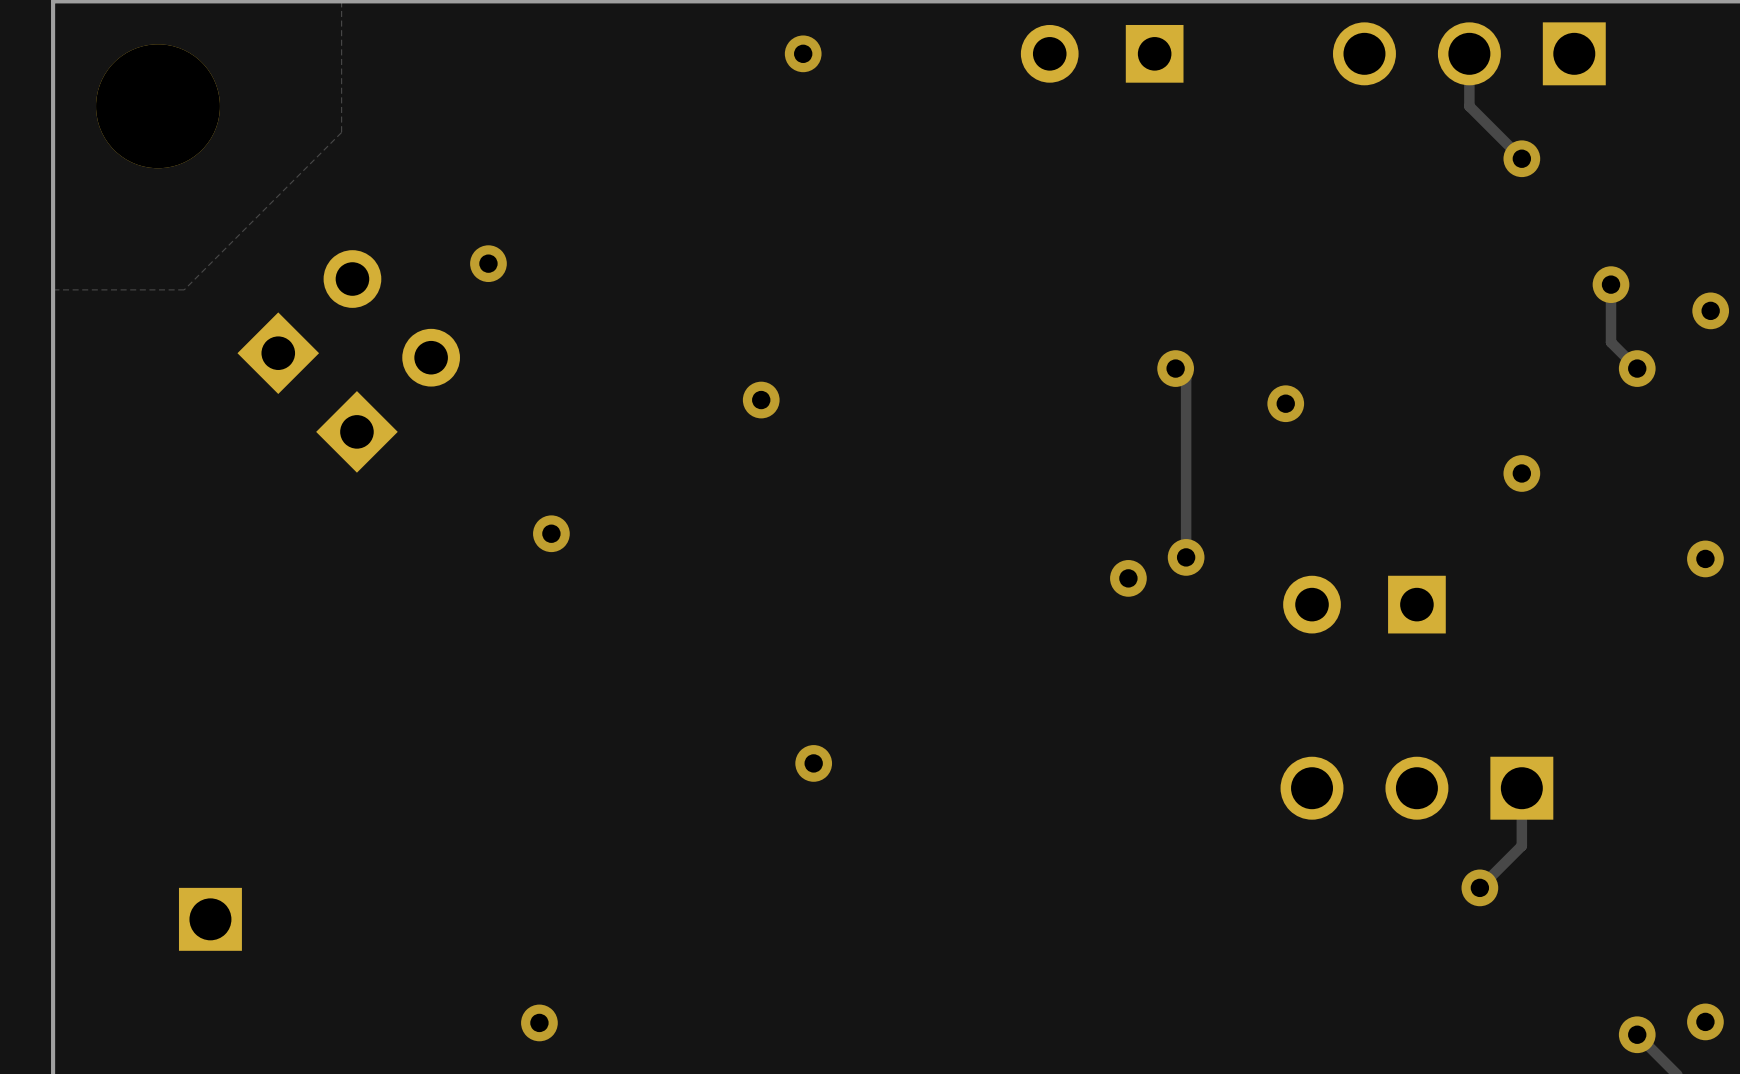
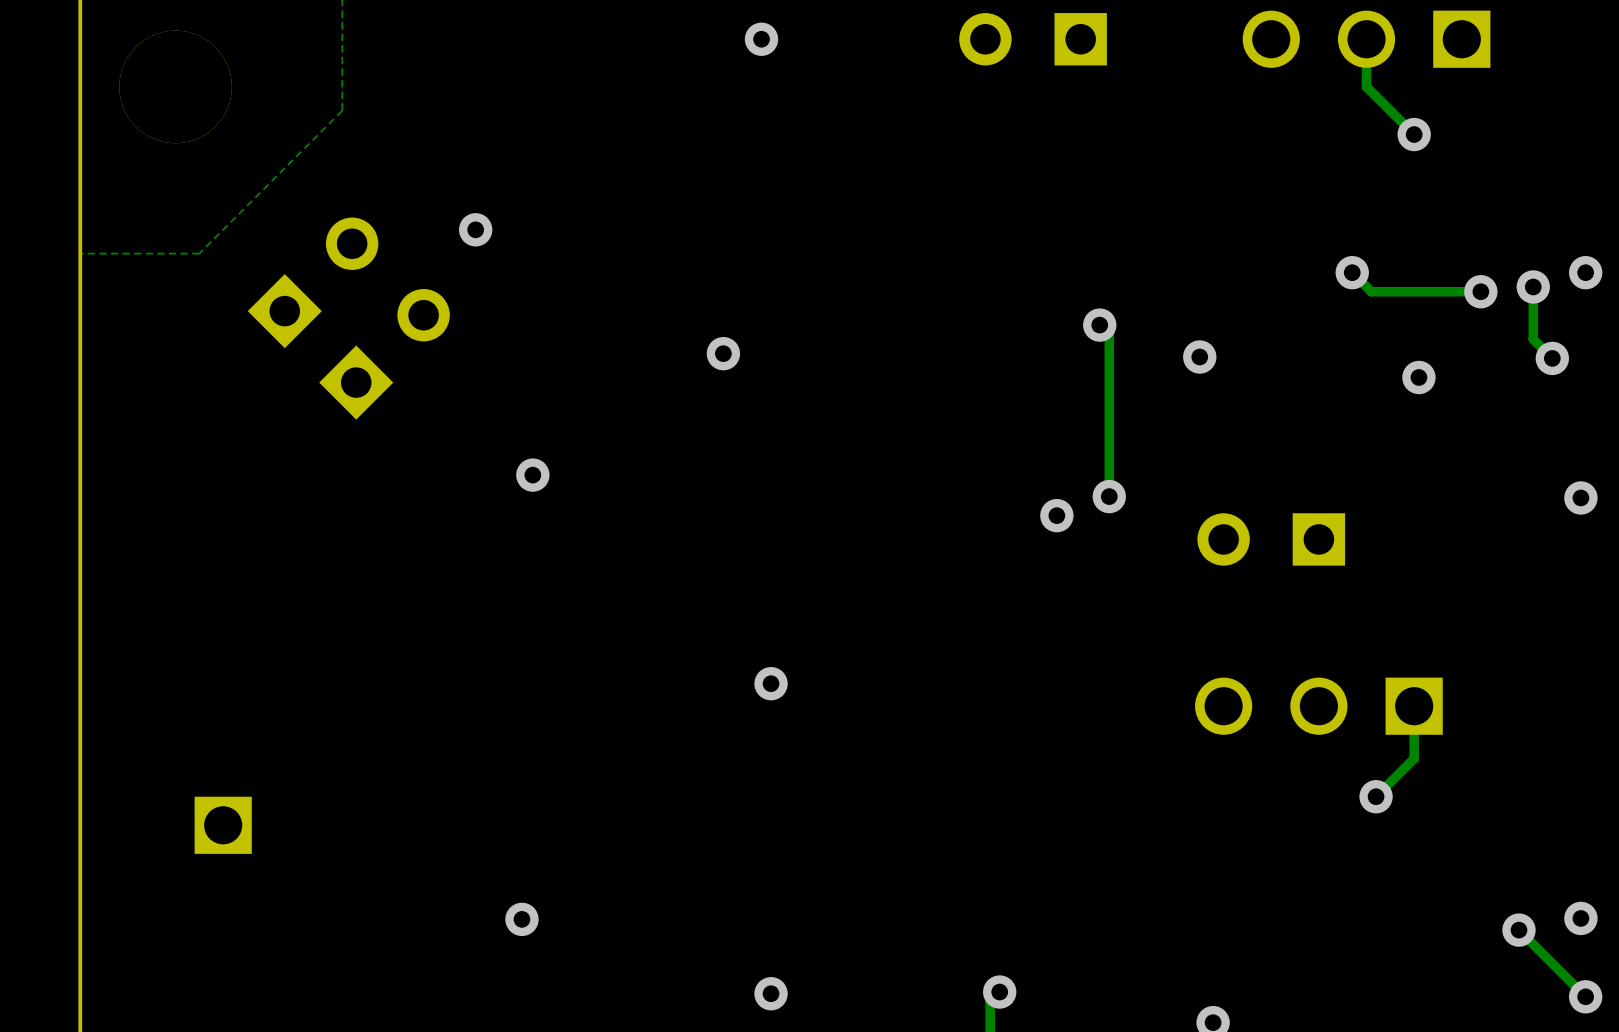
track: (1611, 284) (1611, 342) (1637, 368) -> none
via: (1611, 284) -> none
track: none -> (1352, 272) (1371, 291) (1480, 291)
via: none -> (1352, 272)
track: none -> (1533, 286) (1533, 339) (1552, 358)
via: none -> (1533, 286)
via: none -> (1480, 291)
via: (1637, 368) -> none
via: none -> (1552, 358)
via position: (1521, 473) -> (1418, 377)

